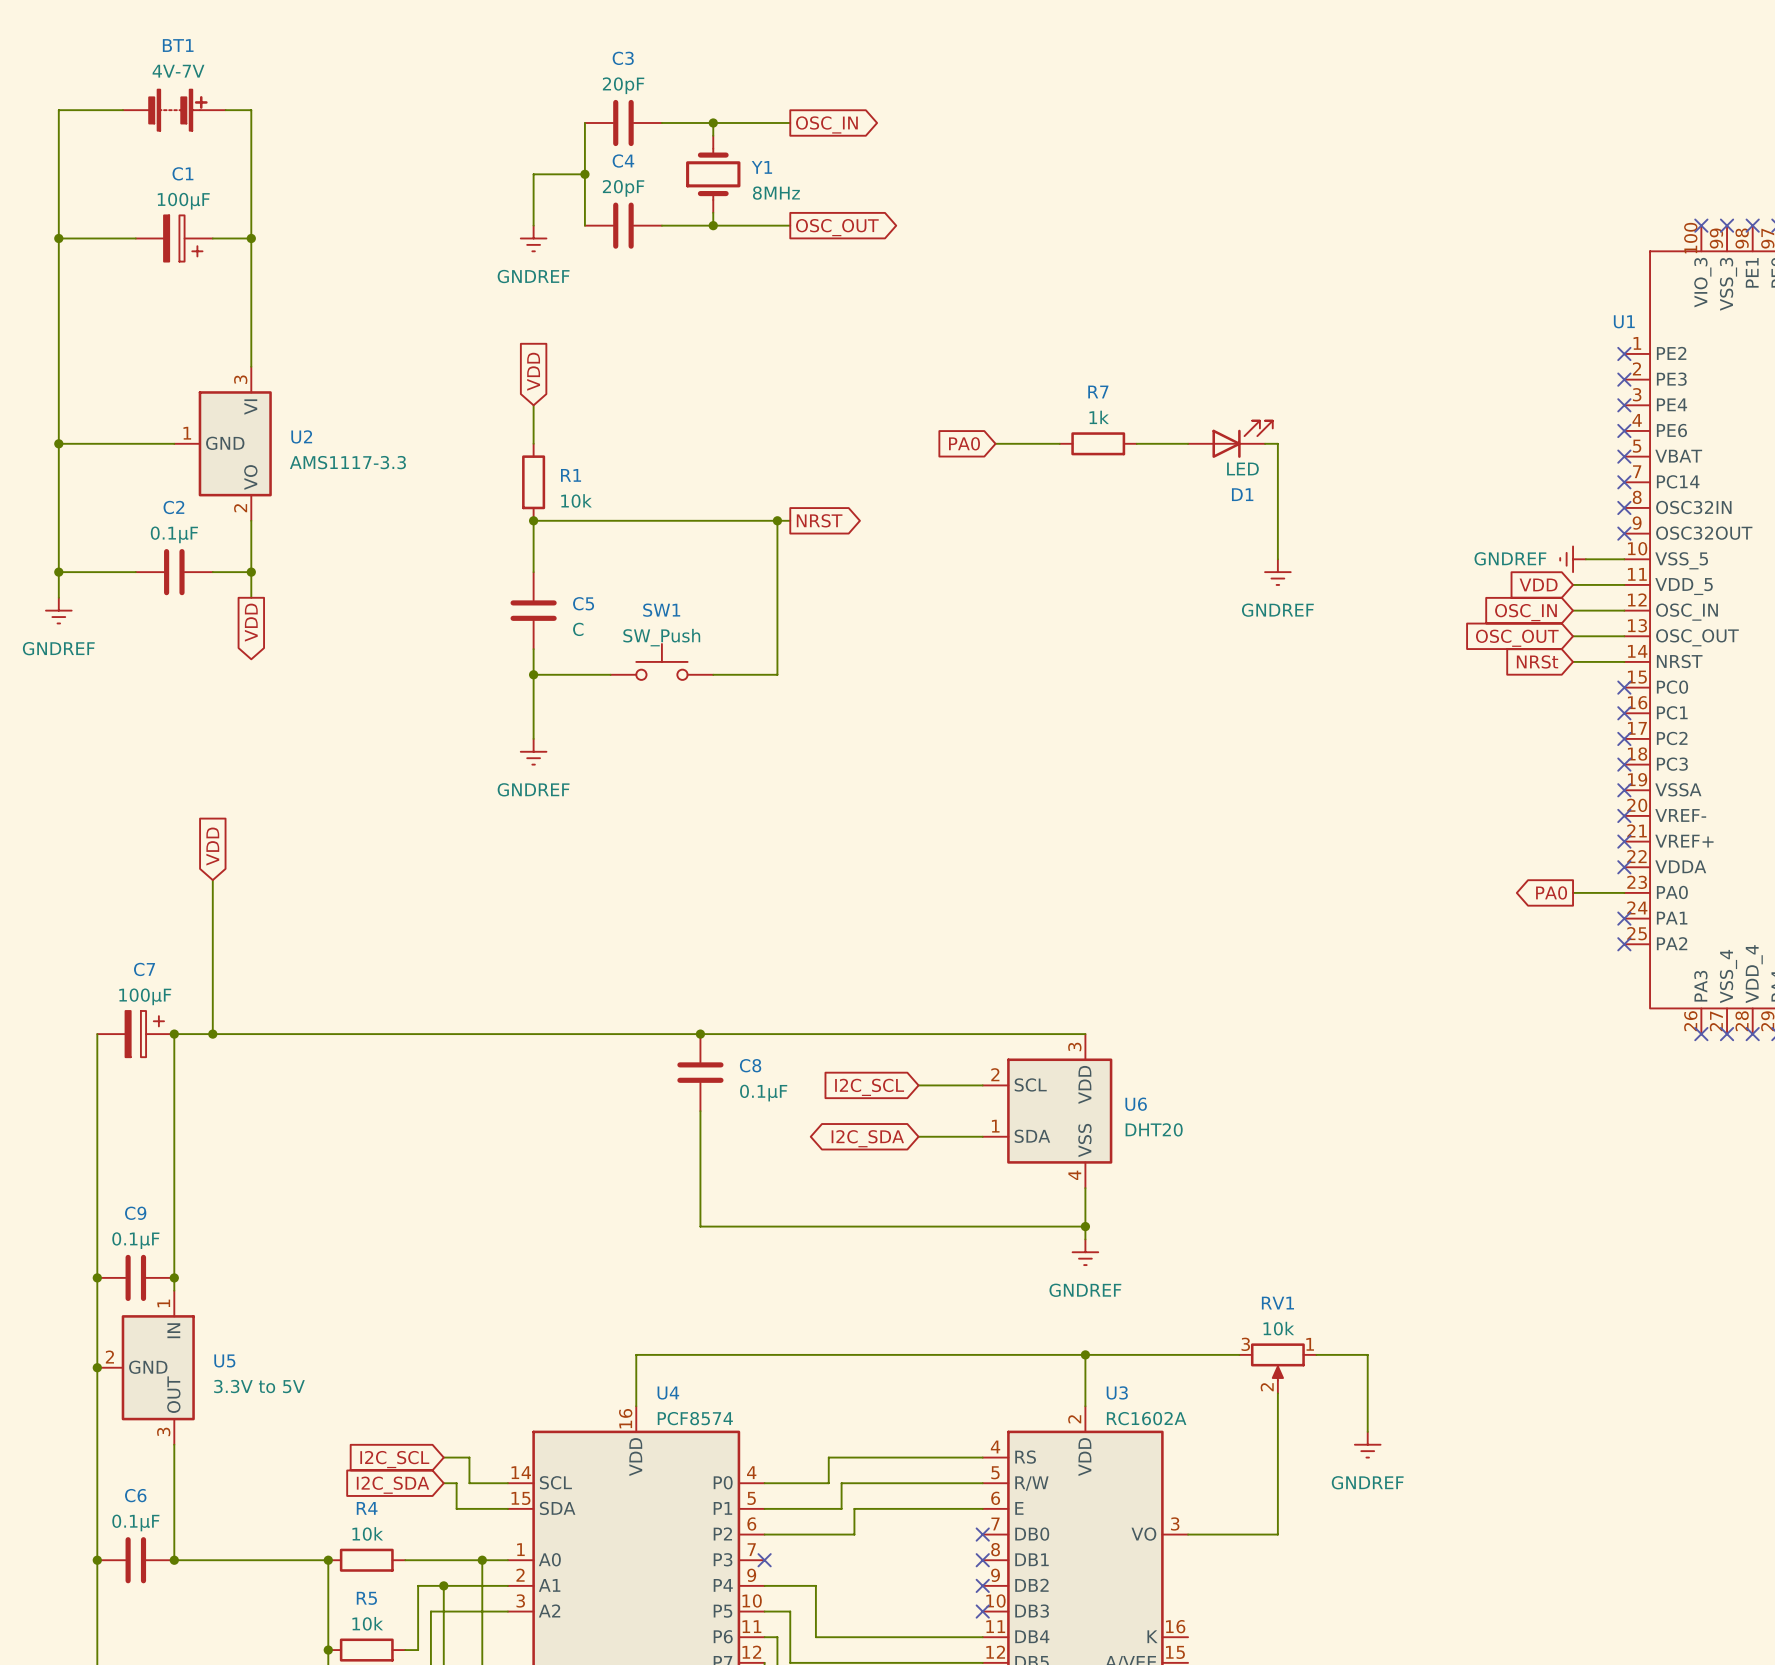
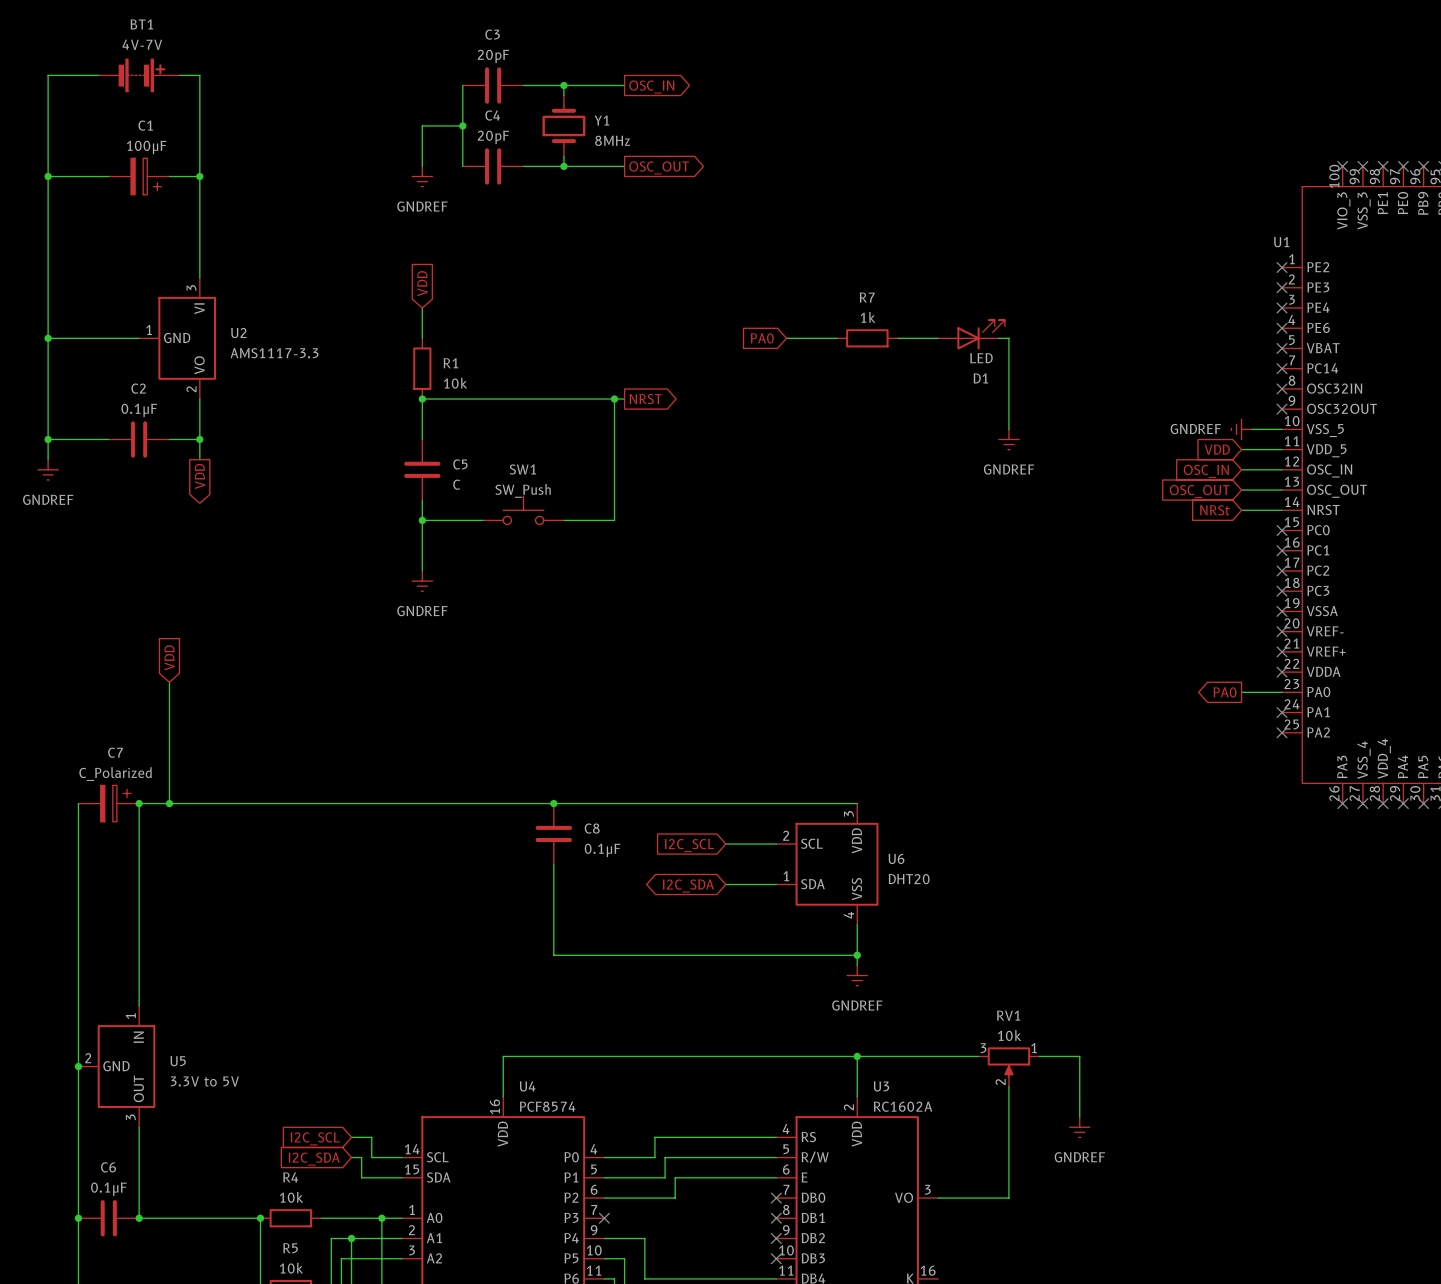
C7 value: 100μF (145, 996) -> C_Polarized (115, 774)
junction: (97, 1277) -> none
C9: 0.1μF (135, 1277) -> none
junction: (174, 1277) -> none

